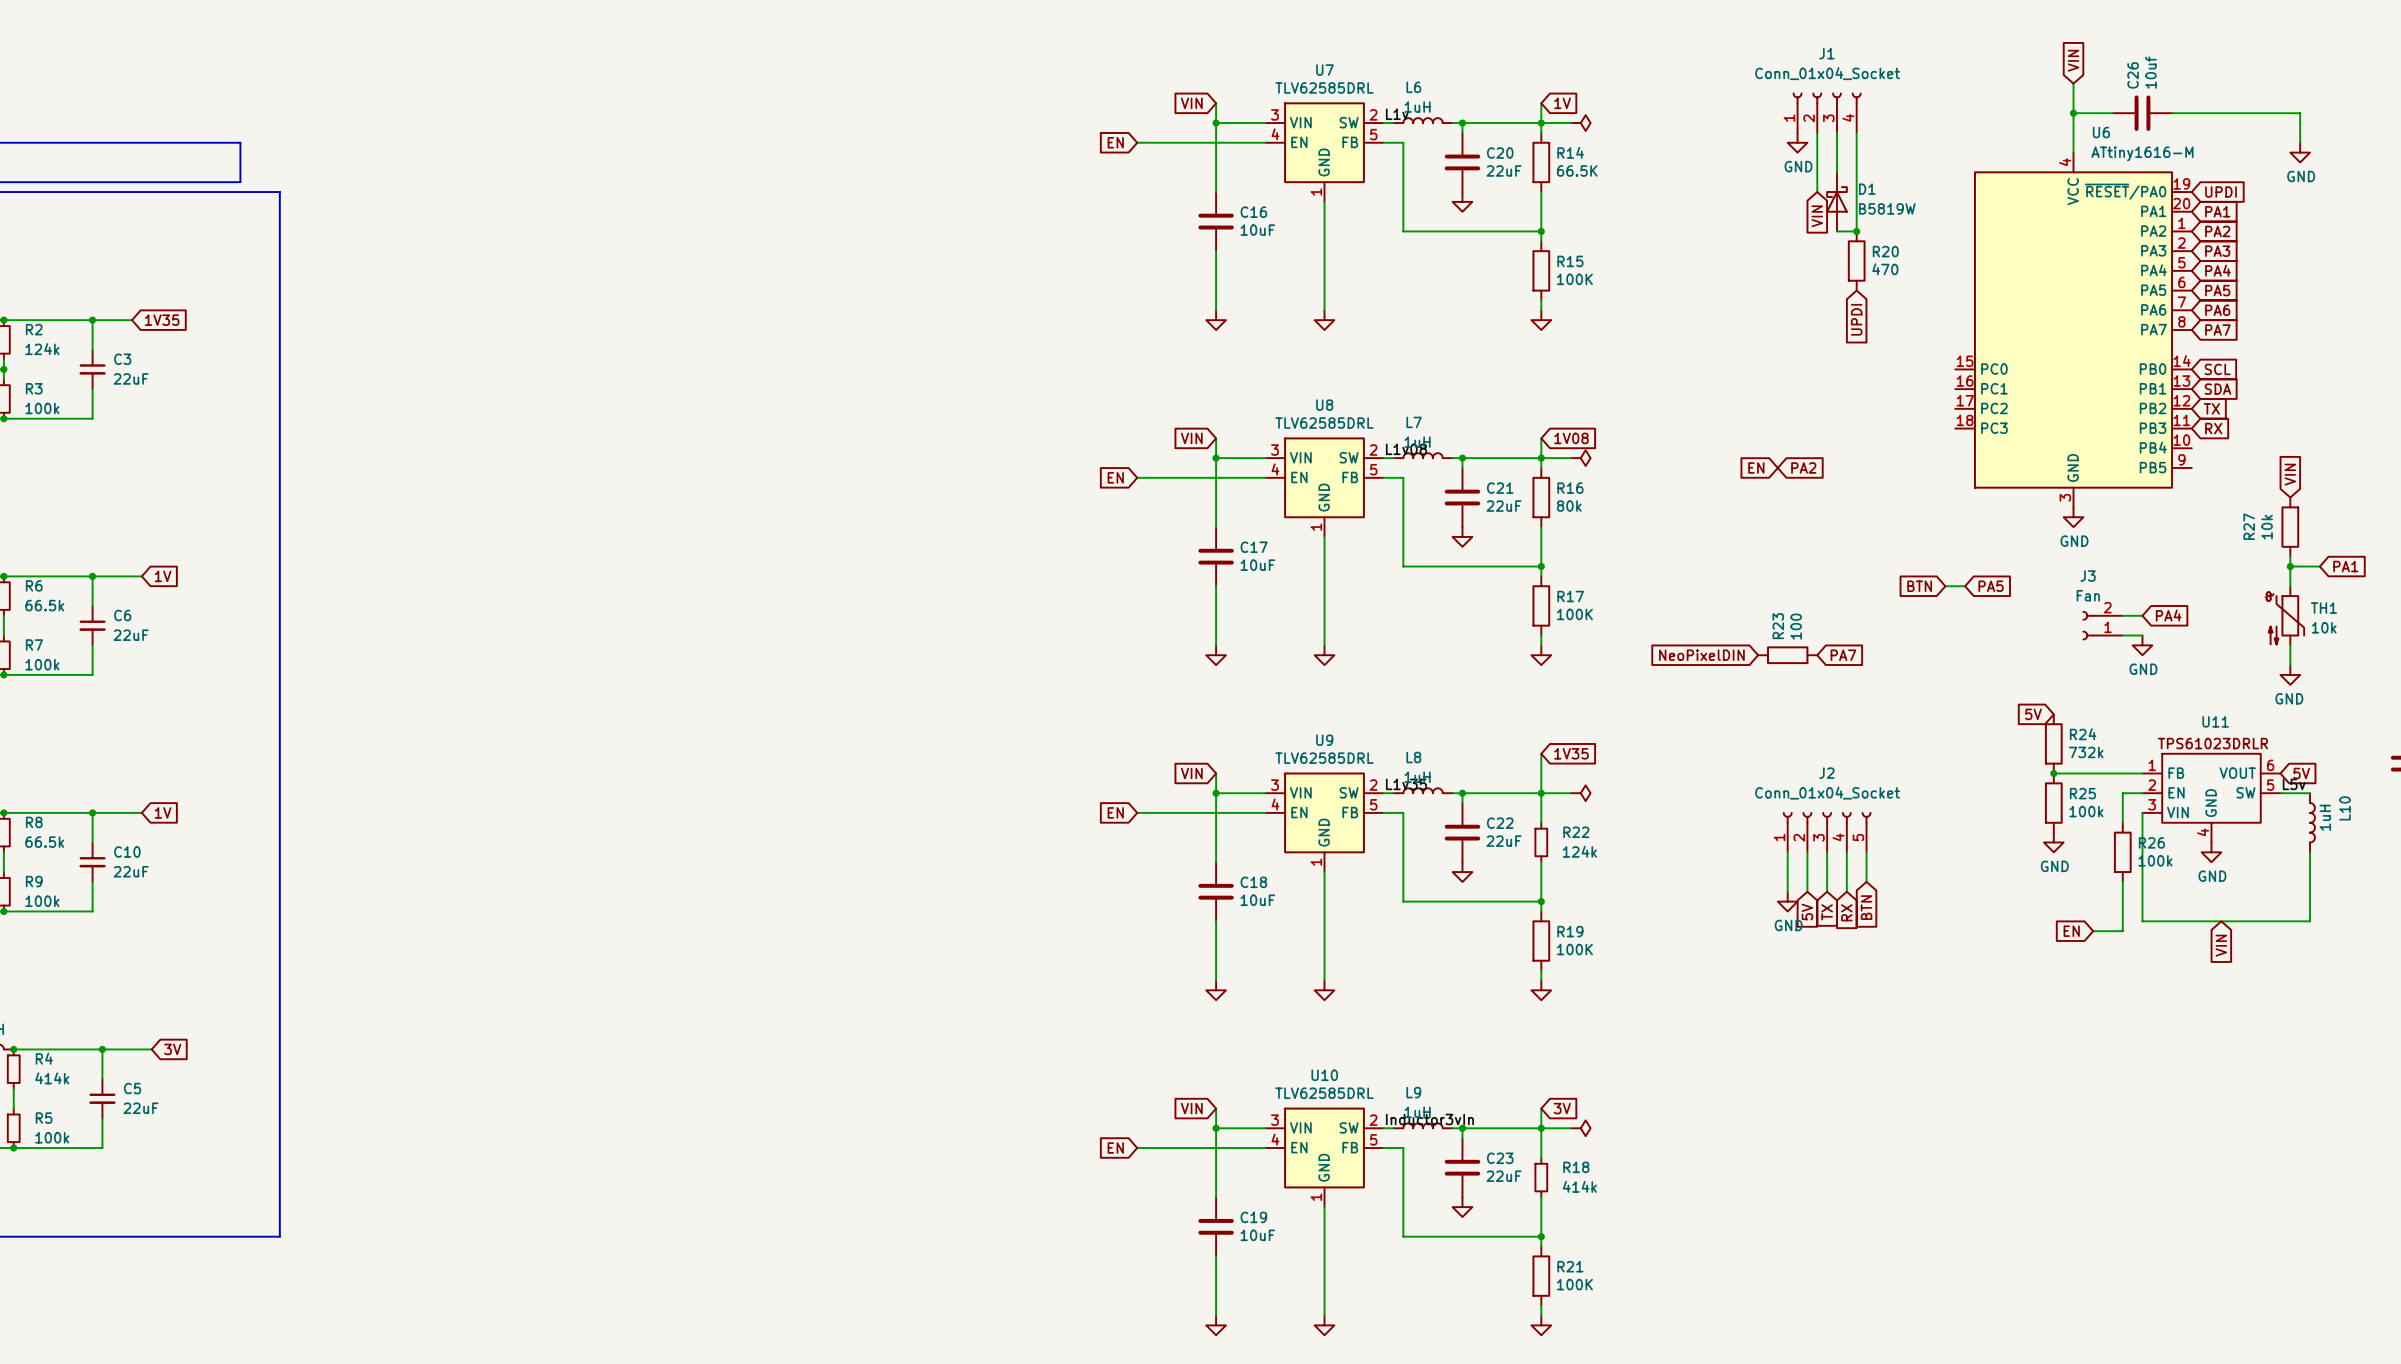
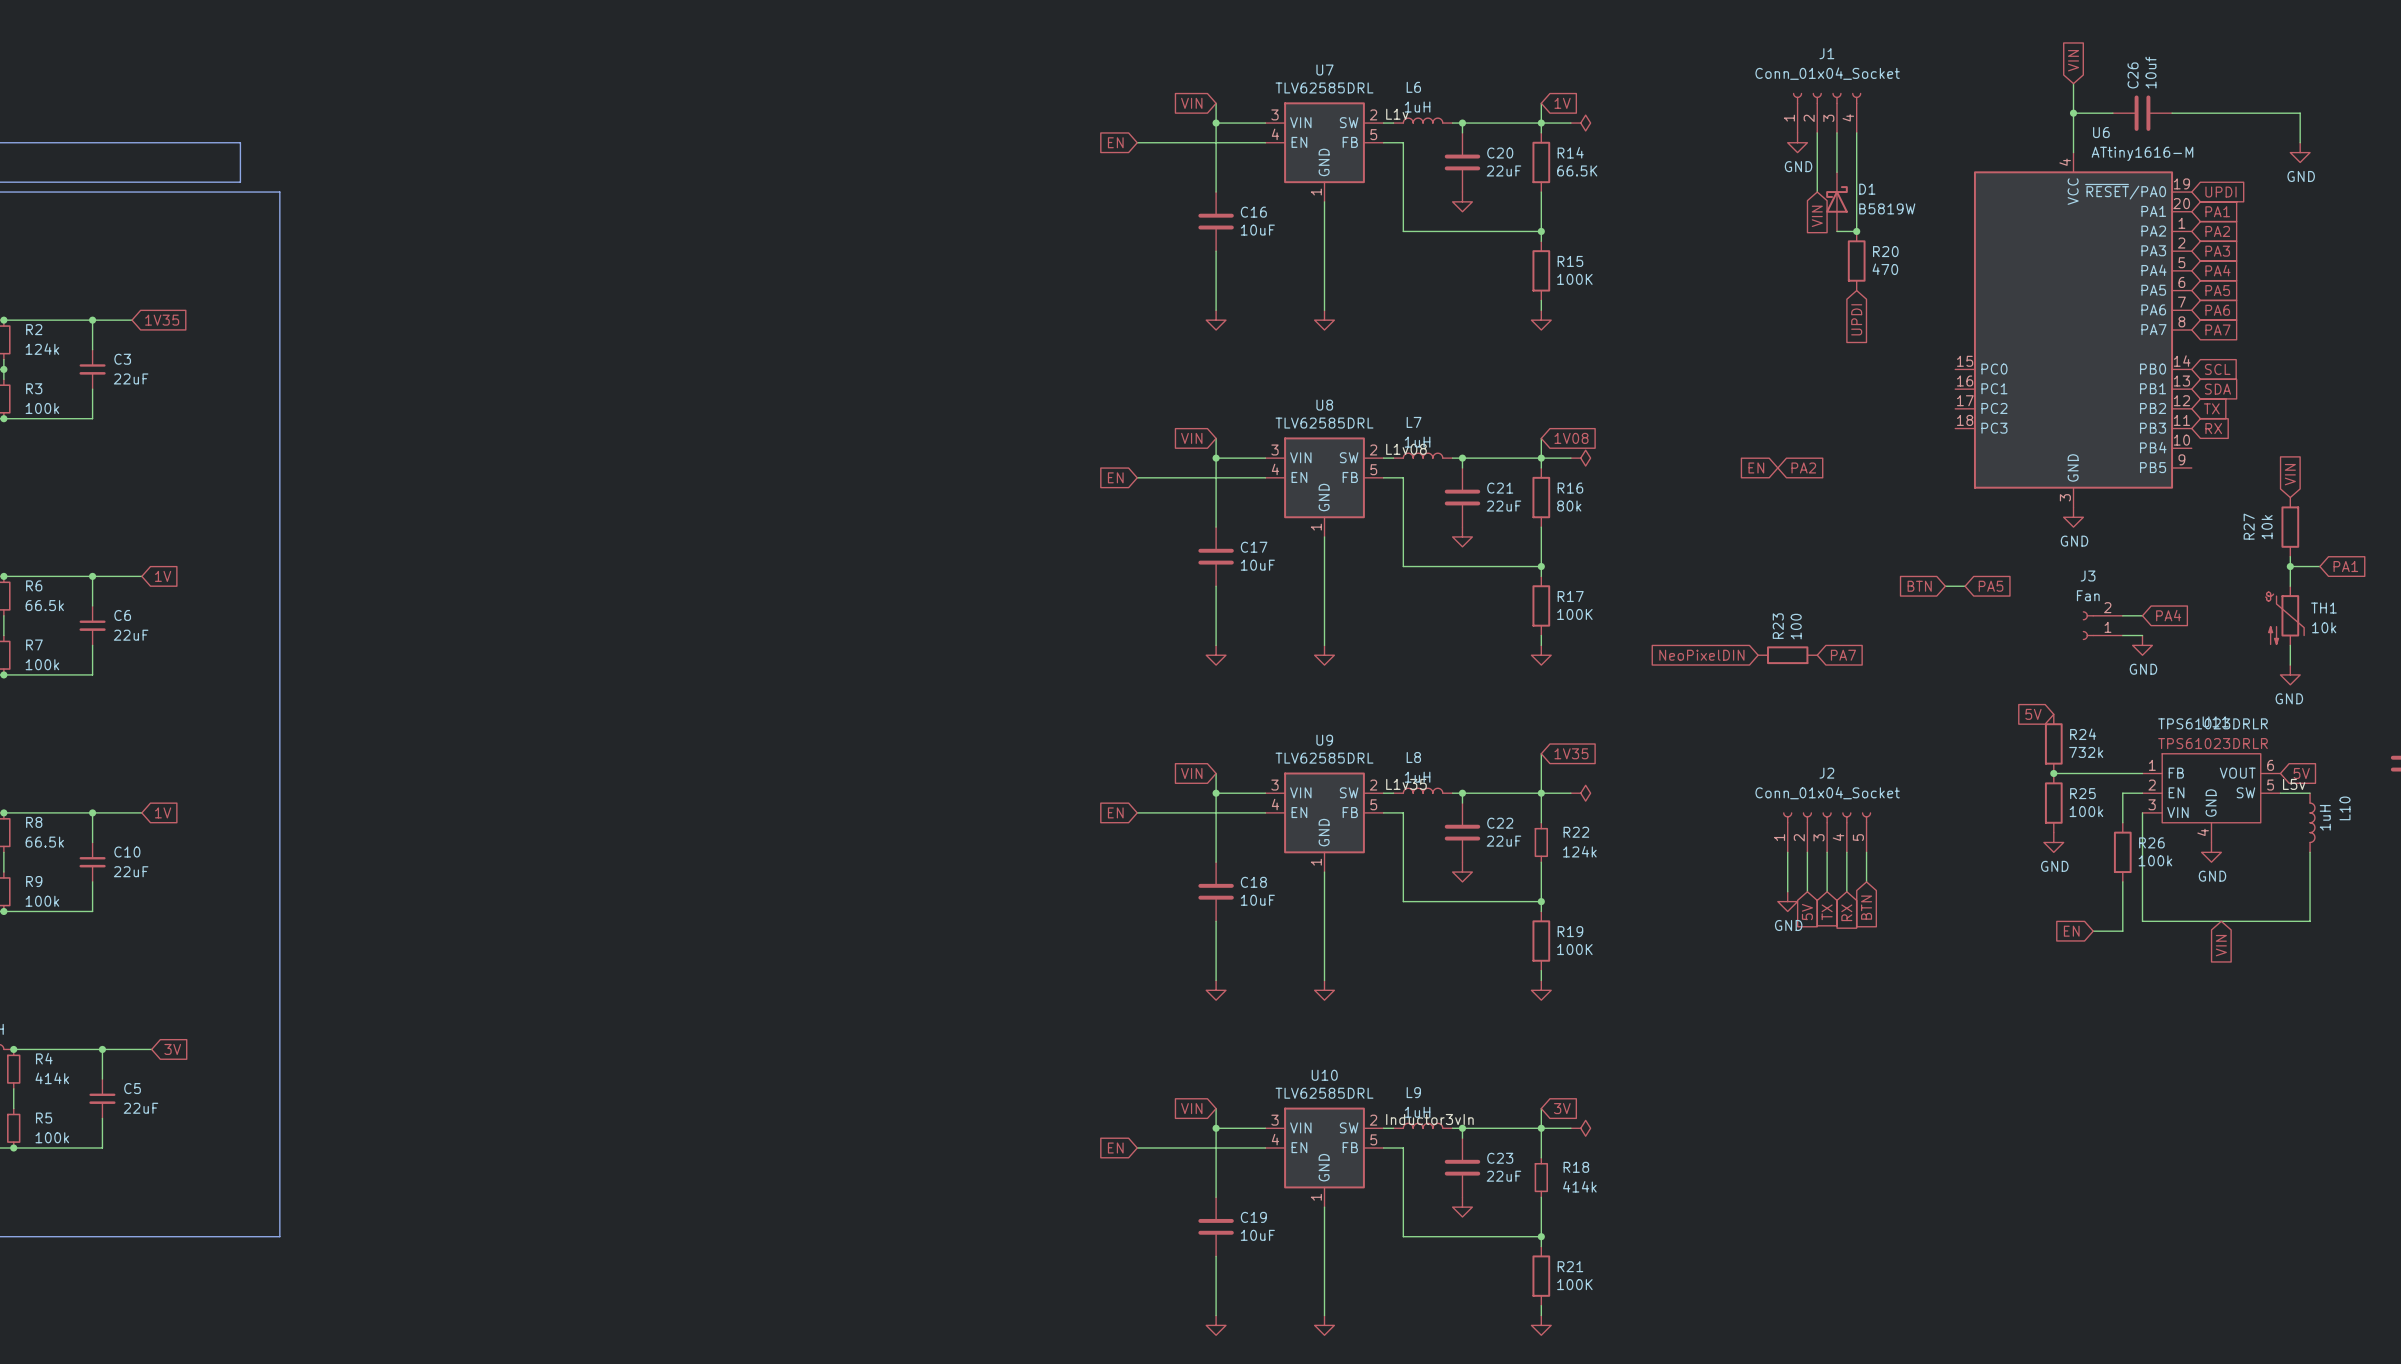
U11 value: none -> TPS61023DRLR (2212, 723)

